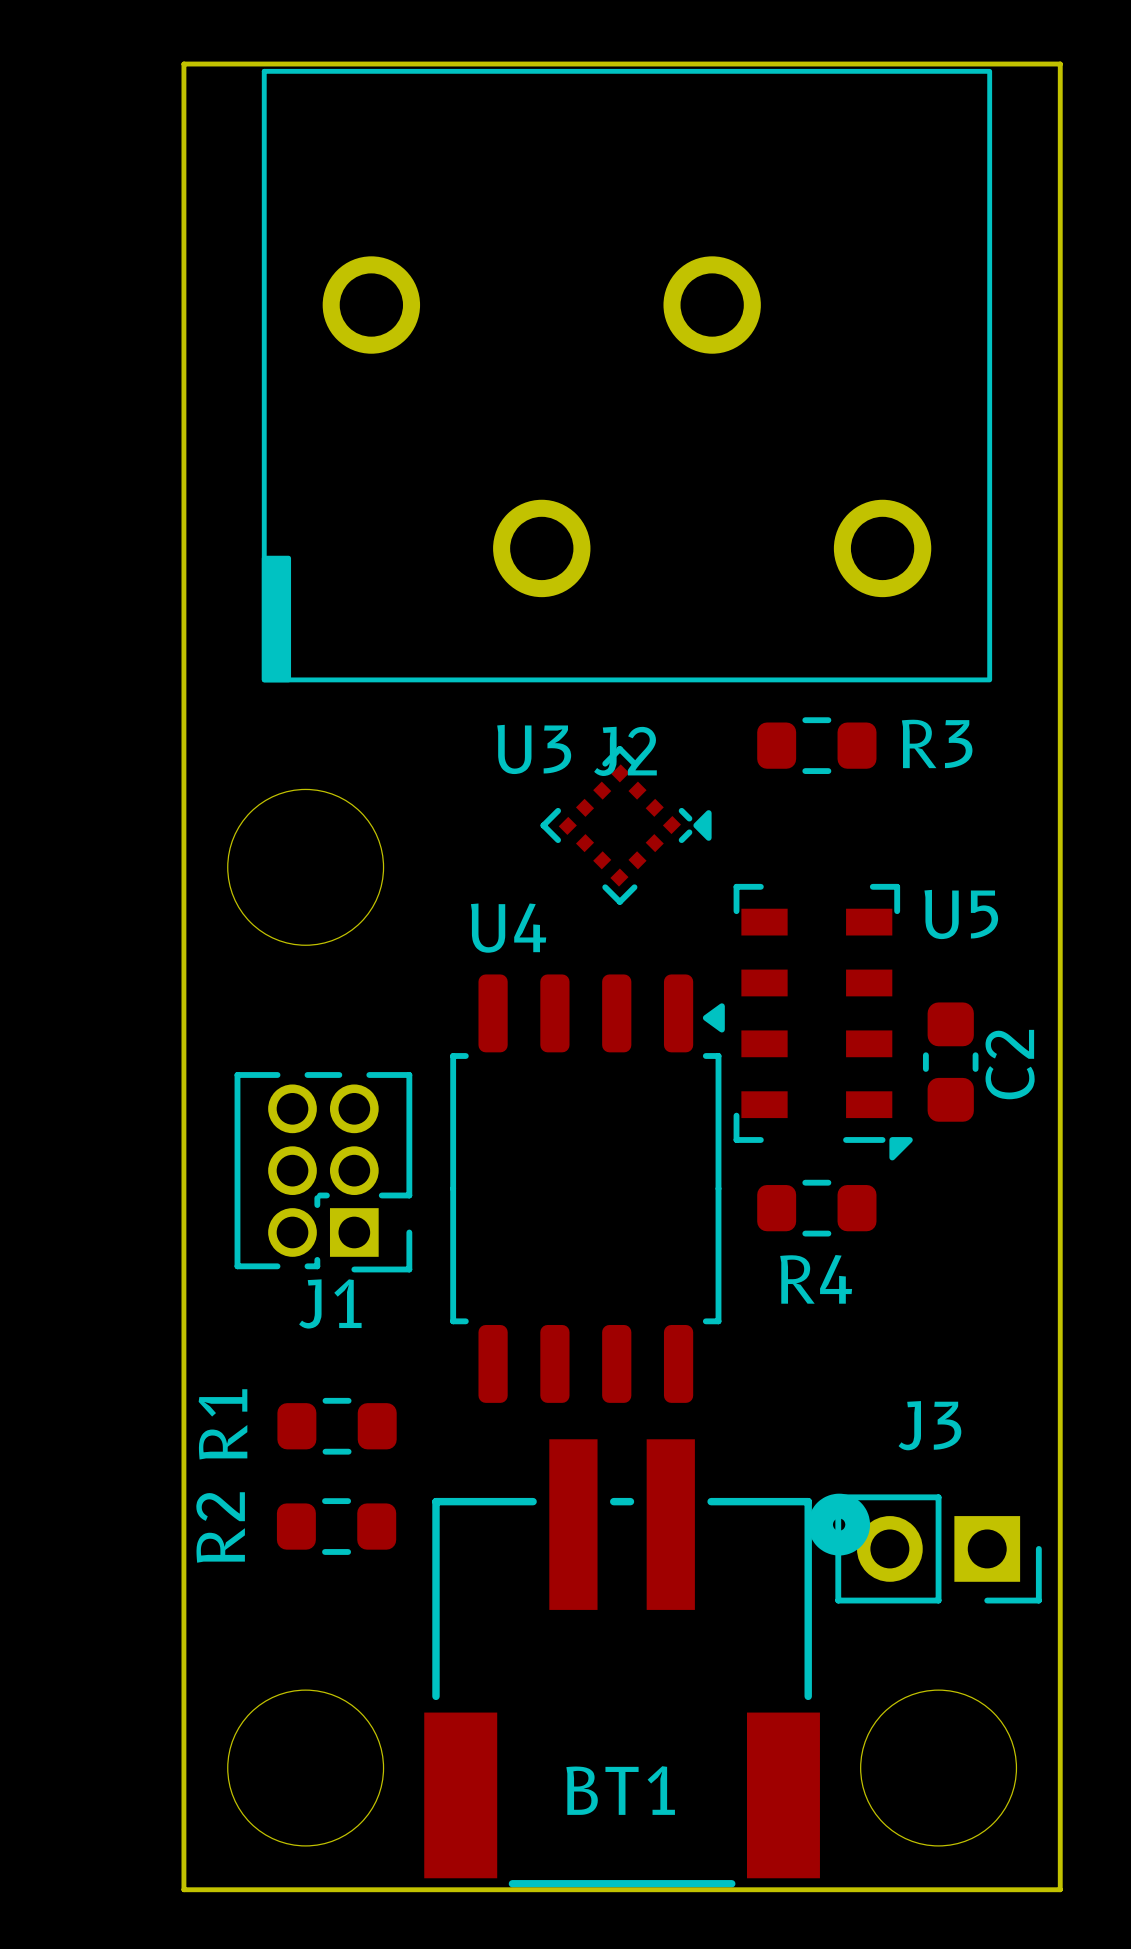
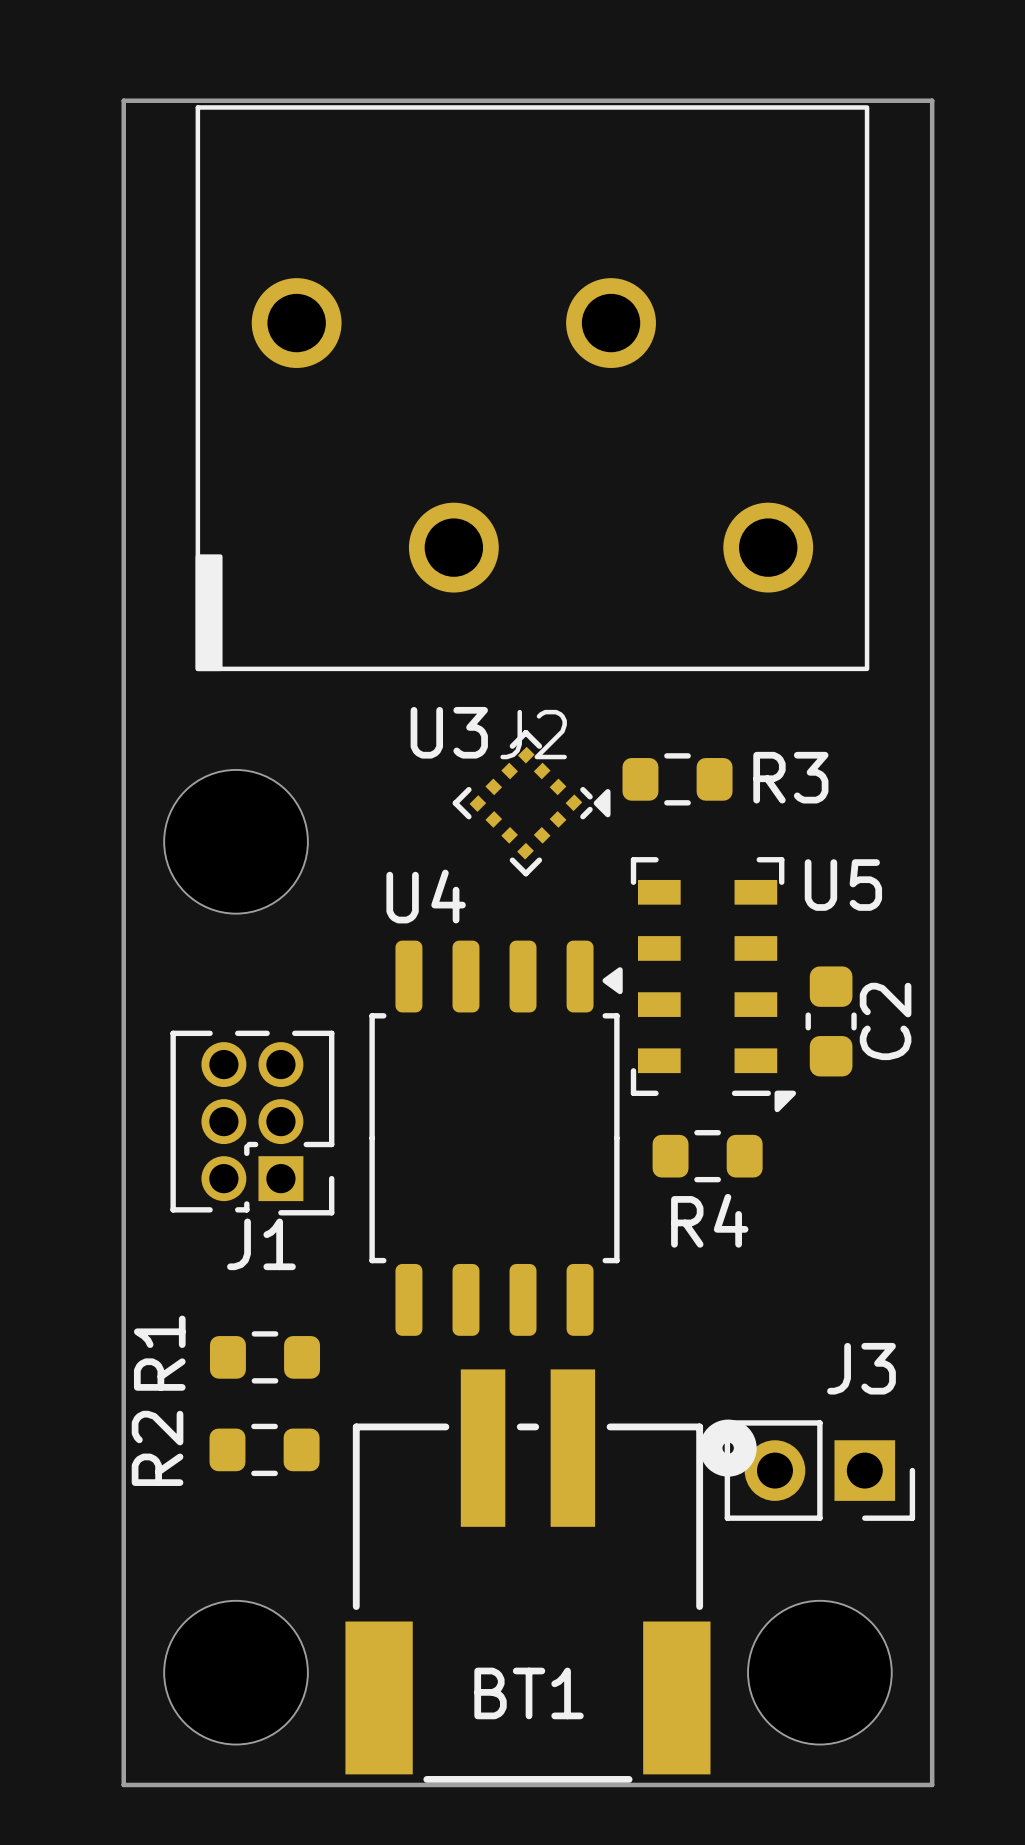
R3 position: (816, 745) -> (677, 779)
J3 name position: J3 (929, 1425) -> J3 (861, 1368)

